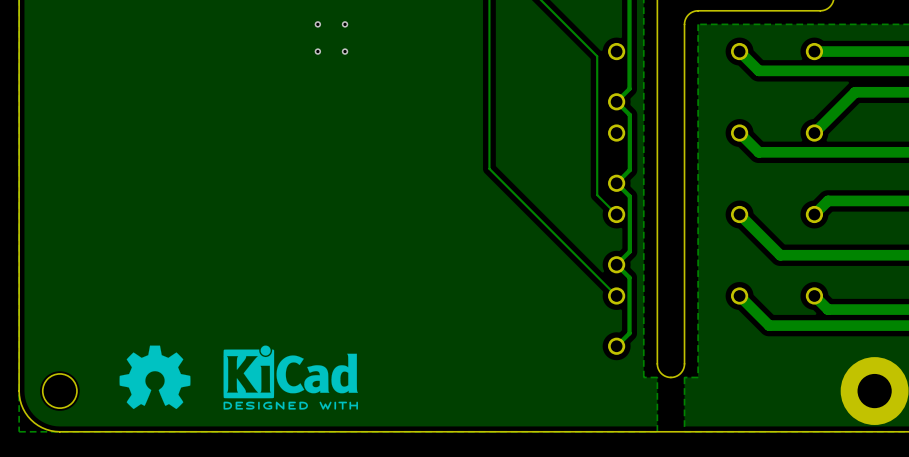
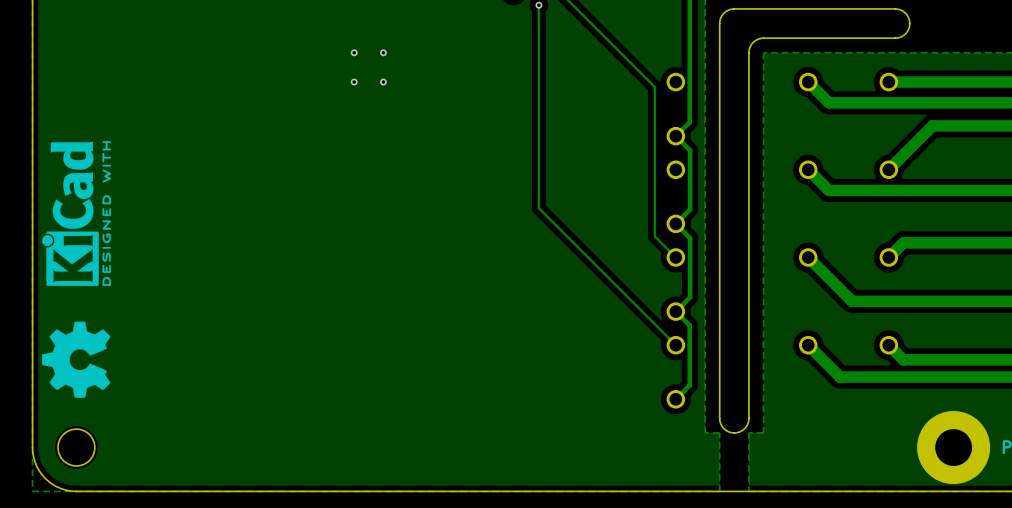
drawing: none -> [42, 141, 112, 286]
drawing: none -> [42, 321, 111, 398]
drawing: [119, 345, 191, 410] -> none
drawing: [223, 345, 358, 410] -> none

